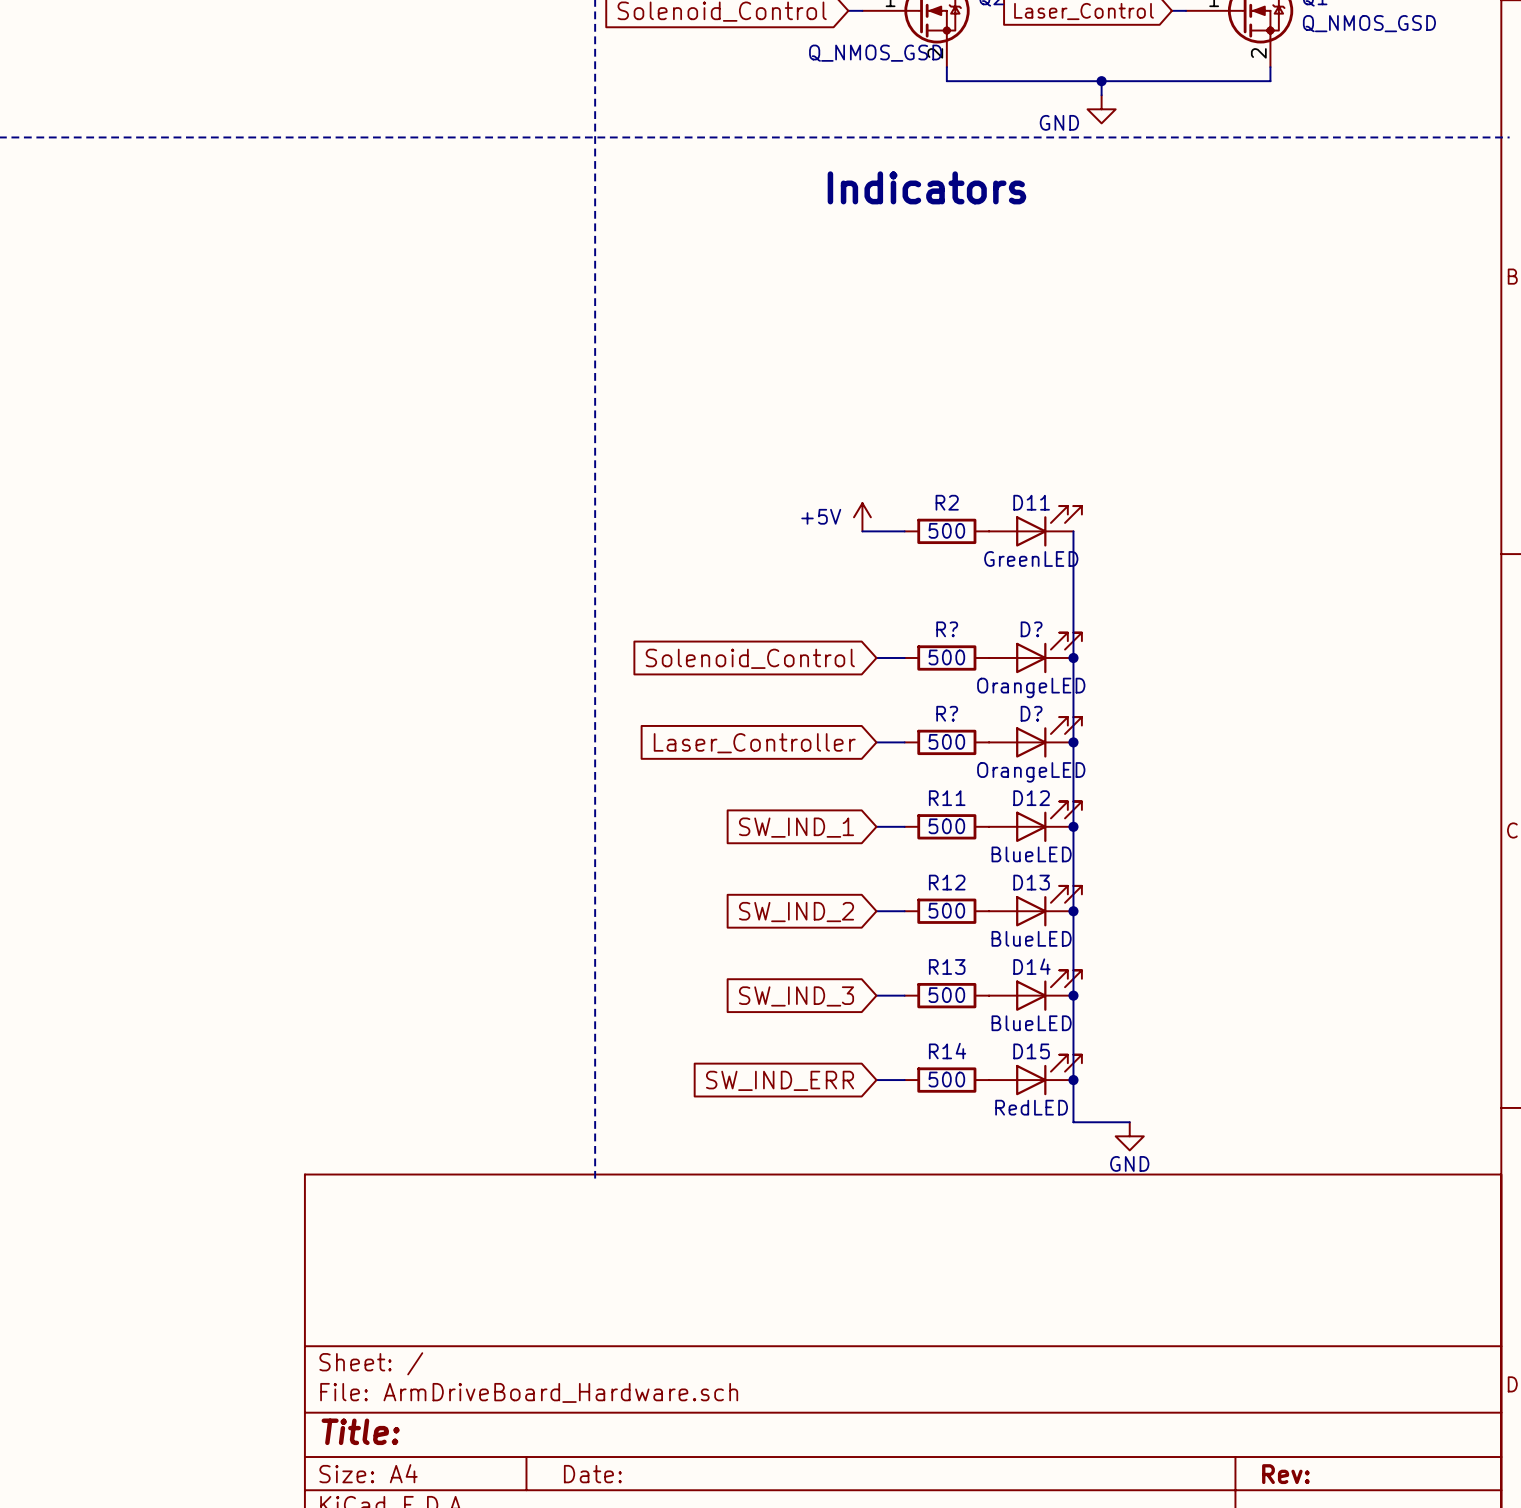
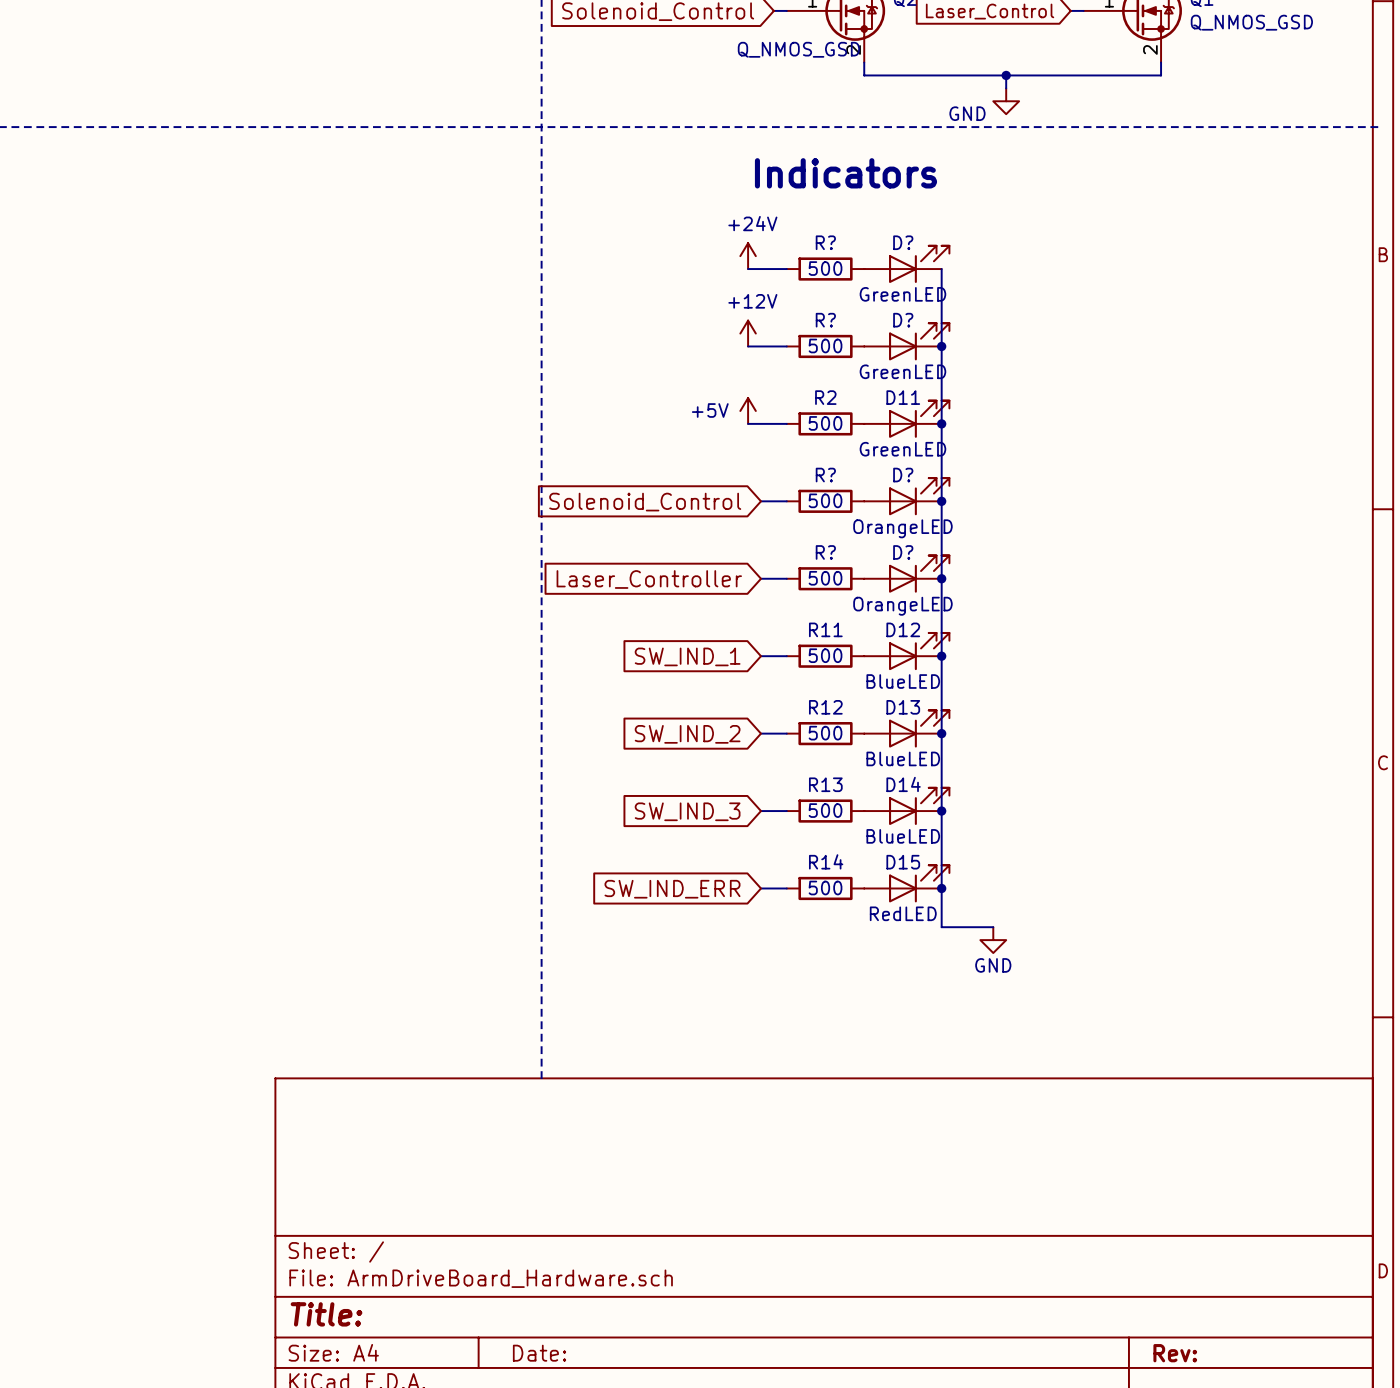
power symbol: none -> +24V (748, 256)
D?: none -> GreenLED (906, 264)
wire: none -> (748, 269) (786, 269)
R?: none -> 500 (825, 269)
wire: none -> (941, 269) (941, 927) (993, 927)
power symbol: none -> +12V (748, 333)
D?: none -> GreenLED (906, 341)
wire: none -> (748, 346) (786, 346)
R?: none -> 500 (825, 346)
junction: none -> (941, 346)
junction: none -> (941, 423)
power symbol position: +5V (862, 517) -> +5V (748, 410)
D11 position: (1035, 526) -> (906, 419)
wire: (862, 531) (904, 531) -> (748, 423) (786, 423)
R2 position: (946, 531) -> (825, 423)
wire: (1073, 531) (1073, 1122) (1129, 1122) -> none
D?: none -> OrangeLED (906, 496)
R?: none -> 500 (825, 501)
junction: none -> (941, 501)
junction: none -> (941, 578)
D? position: (1035, 652) -> (906, 574)
wire: (876, 657) (904, 657) -> (760, 501) (786, 501)
R? position: (946, 657) -> (825, 578)
junction: (1073, 657) -> none
global label position: Solenoid_Control (750, 658) -> Solenoid_Control (645, 502)
junction: none -> (941, 656)
D?: OrangeLED (1035, 737) -> none
wire: (876, 742) (904, 742) -> (760, 578) (786, 578)
R?: 500 (946, 742) -> none
junction: (1073, 742) -> none
global label position: Laser_Controller (754, 743) -> Laser_Controller (649, 579)
junction: none -> (941, 733)
D12 position: (1035, 821) -> (906, 651)
wire: (876, 826) (904, 826) -> (760, 656) (786, 656)
R11 position: (946, 826) -> (825, 656)
junction: (1073, 826) -> none
global label position: SW_IND_1 (796, 827) -> SW_IND_1 (687, 656)
junction: none -> (941, 811)
D13 position: (1035, 906) -> (906, 728)
wire: (876, 911) (904, 911) -> (760, 733) (786, 733)
R12 position: (946, 911) -> (825, 733)
junction: (1073, 911) -> none
global label position: SW_IND_2 (796, 912) -> SW_IND_2 (687, 734)
junction: none -> (941, 888)
D14 position: (1035, 990) -> (906, 806)
wire: (876, 995) (904, 995) -> (760, 811) (786, 811)
R13 position: (946, 995) -> (825, 811)
junction: (1073, 995) -> none
global label position: SW_IND_3 (796, 996) -> SW_IND_3 (687, 811)
D15 position: (1035, 1074) -> (906, 883)
global label position: SW_IND_ERR (780, 1080) -> SW_IND_ERR (672, 889)
wire: (876, 1080) (904, 1080) -> (760, 888) (786, 888)
R14 position: (946, 1080) -> (825, 888)
junction: (1073, 1080) -> none
power symbol position: GND (1129, 1136) -> GND (993, 940)

